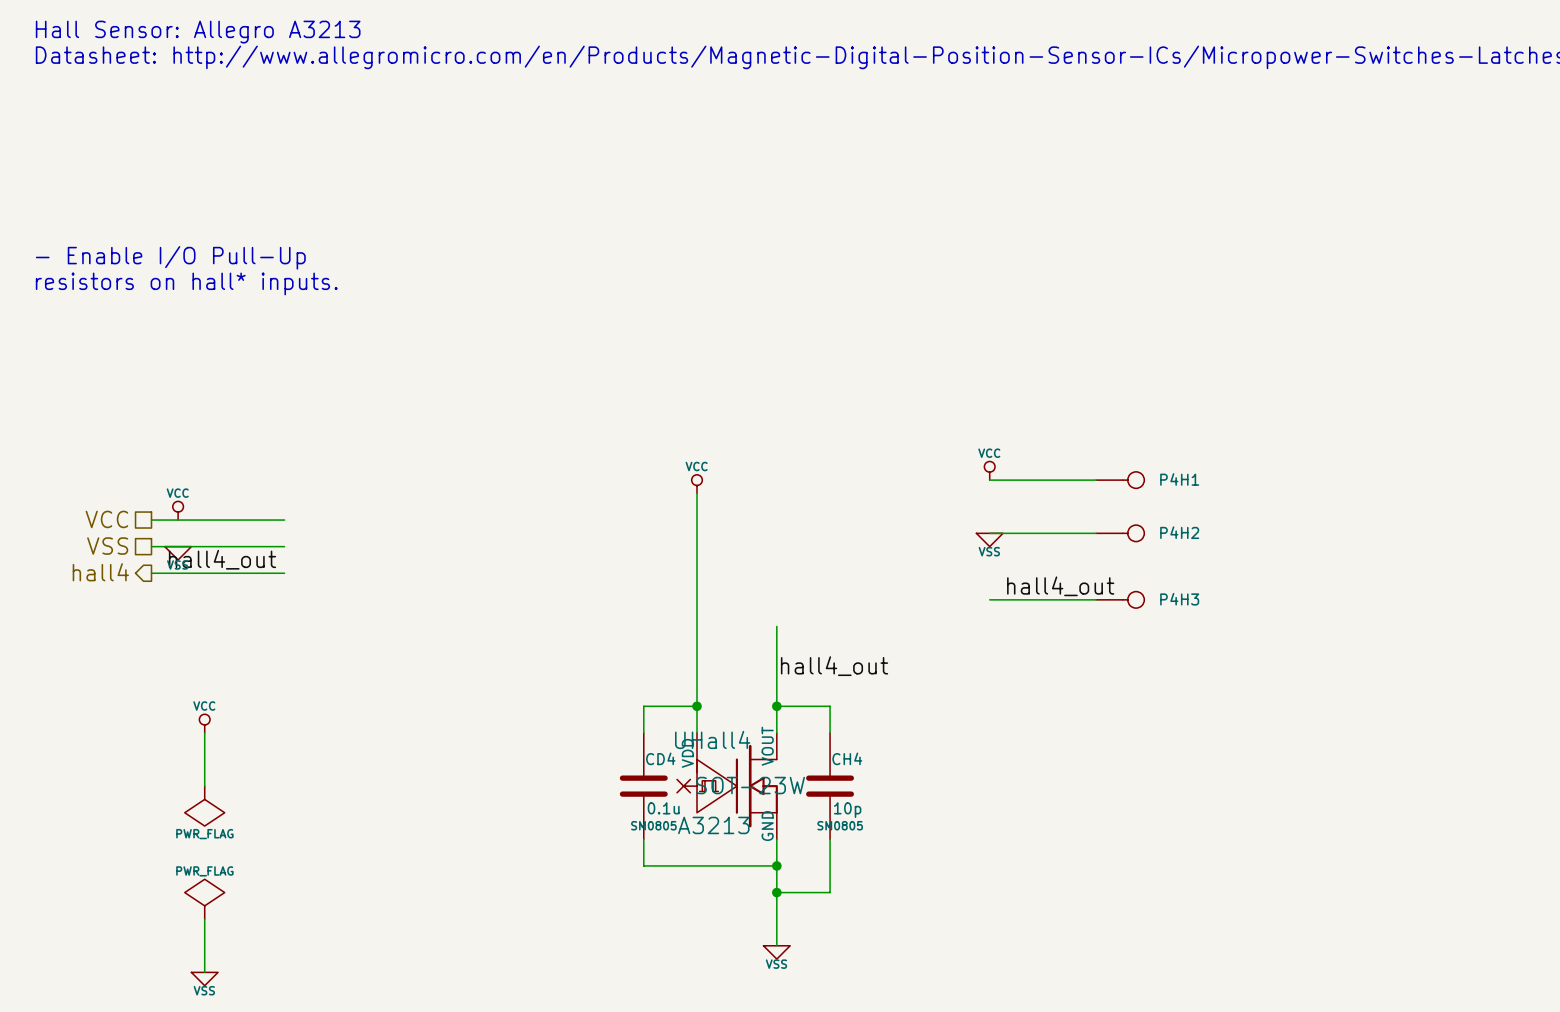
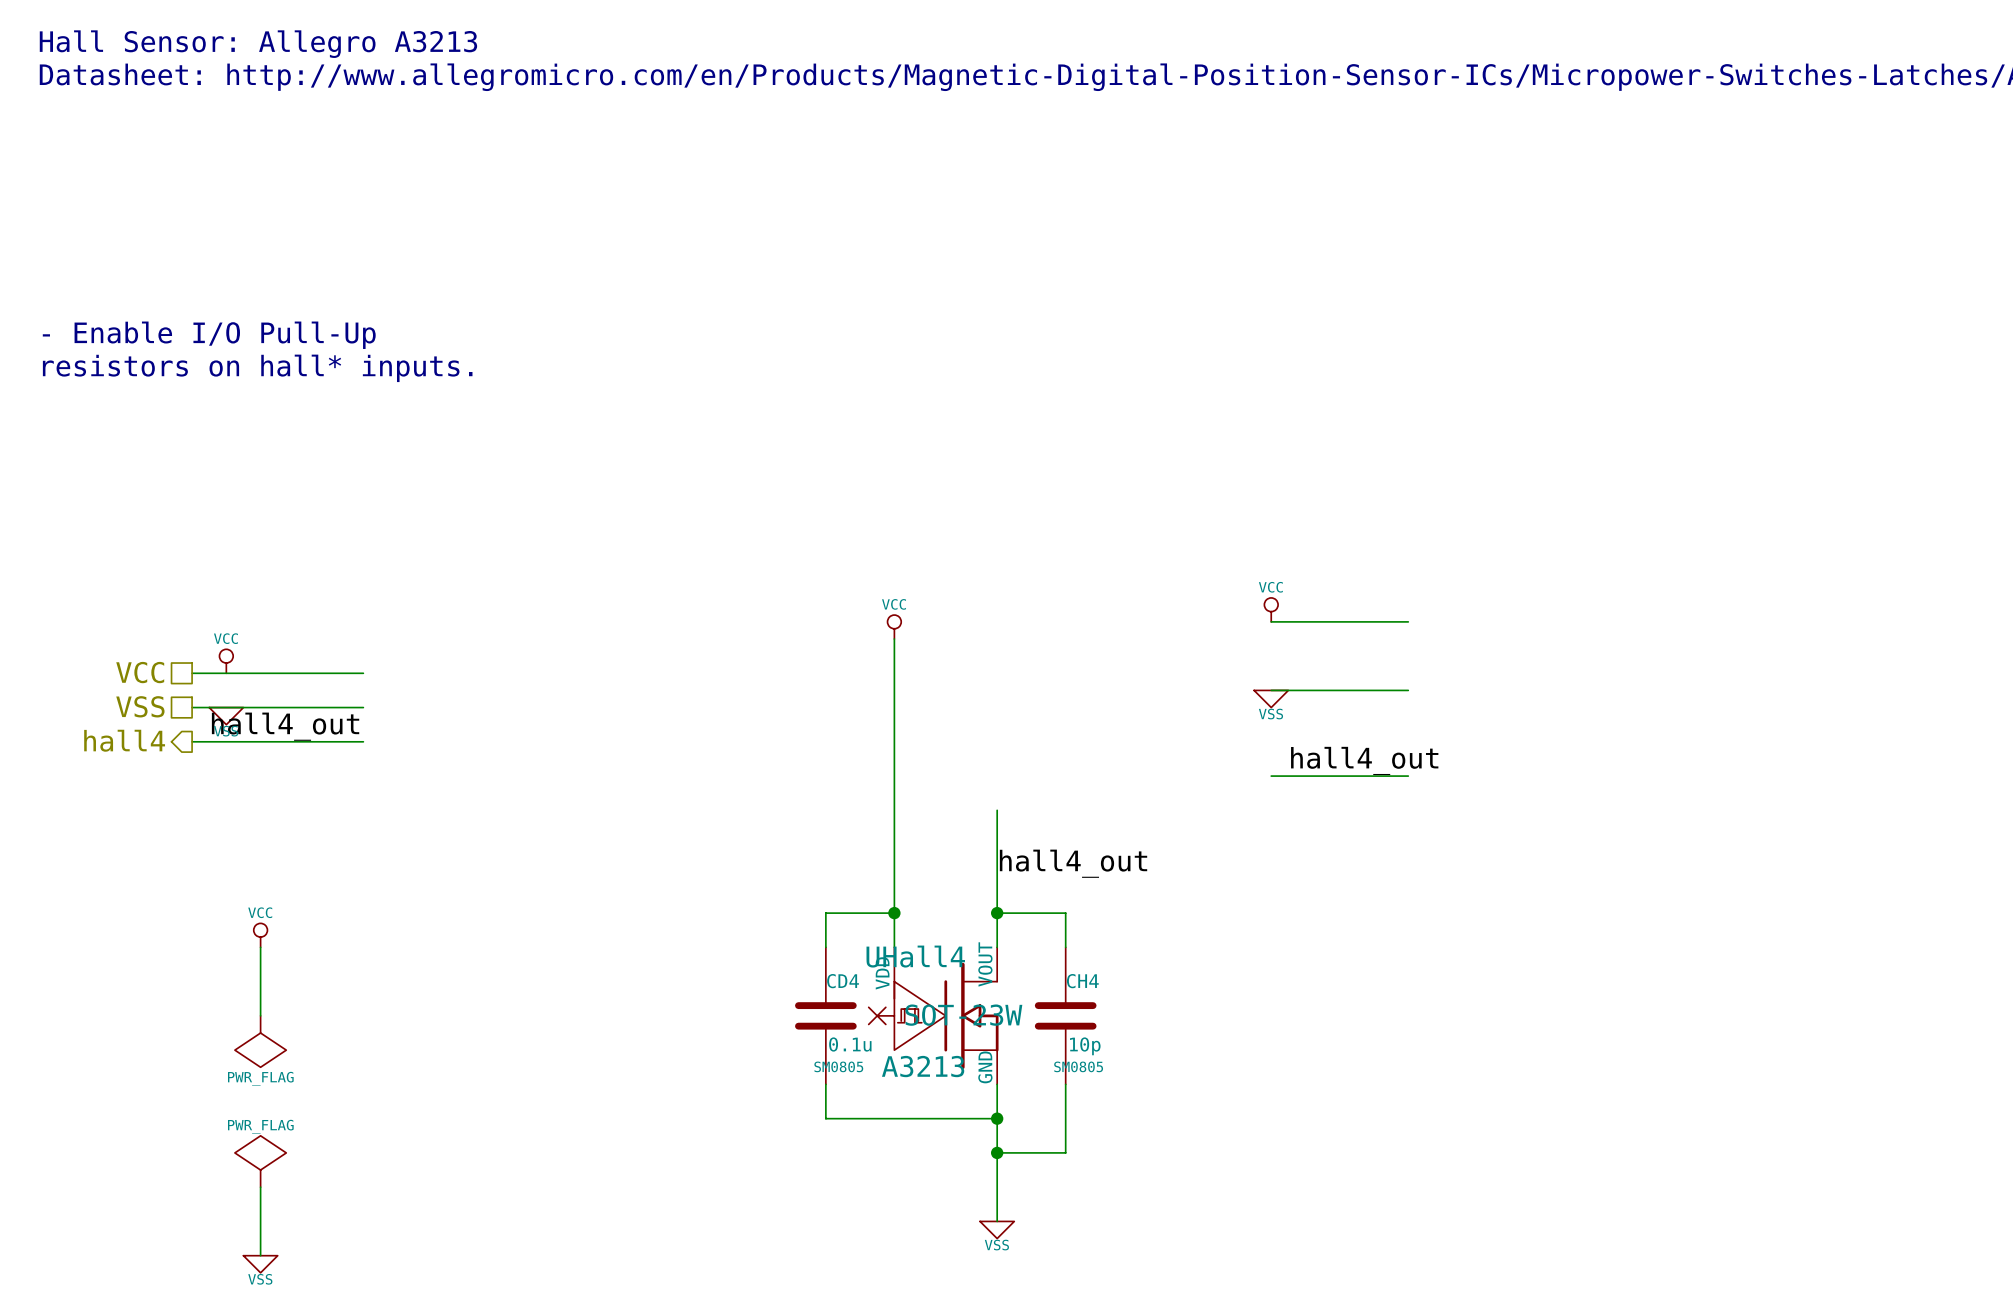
P4H1: (1120, 480) -> none
P4H2: (1120, 533) -> none
P4H3: (1120, 599) -> none

